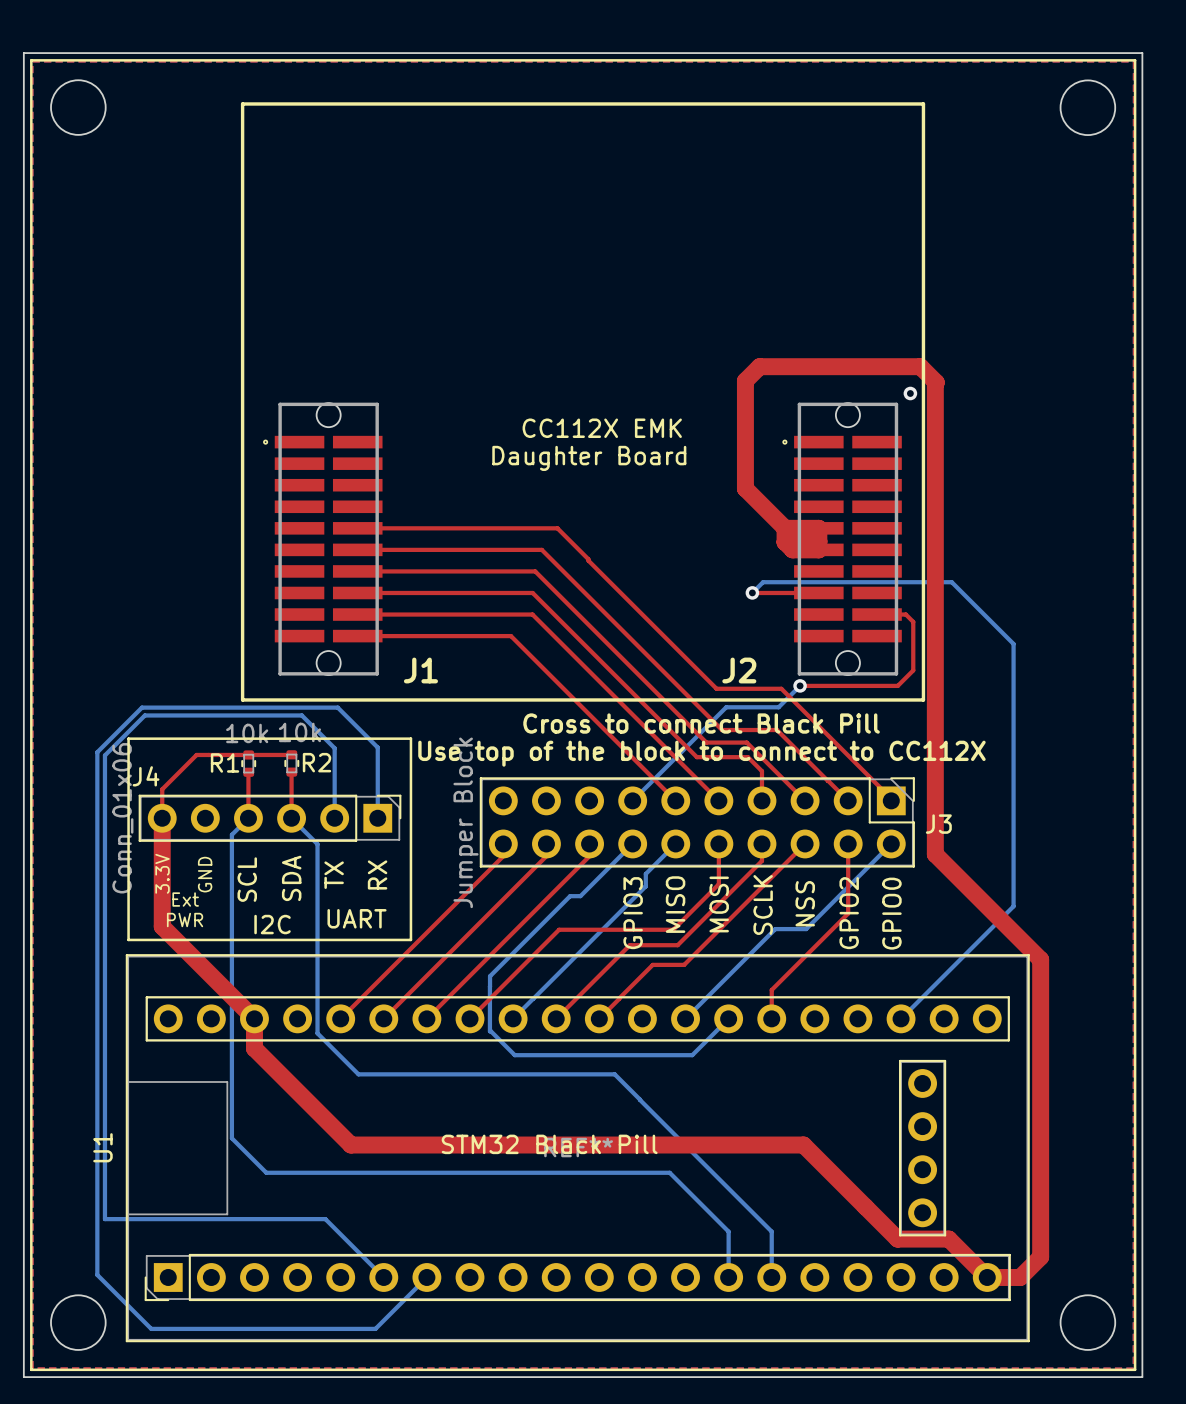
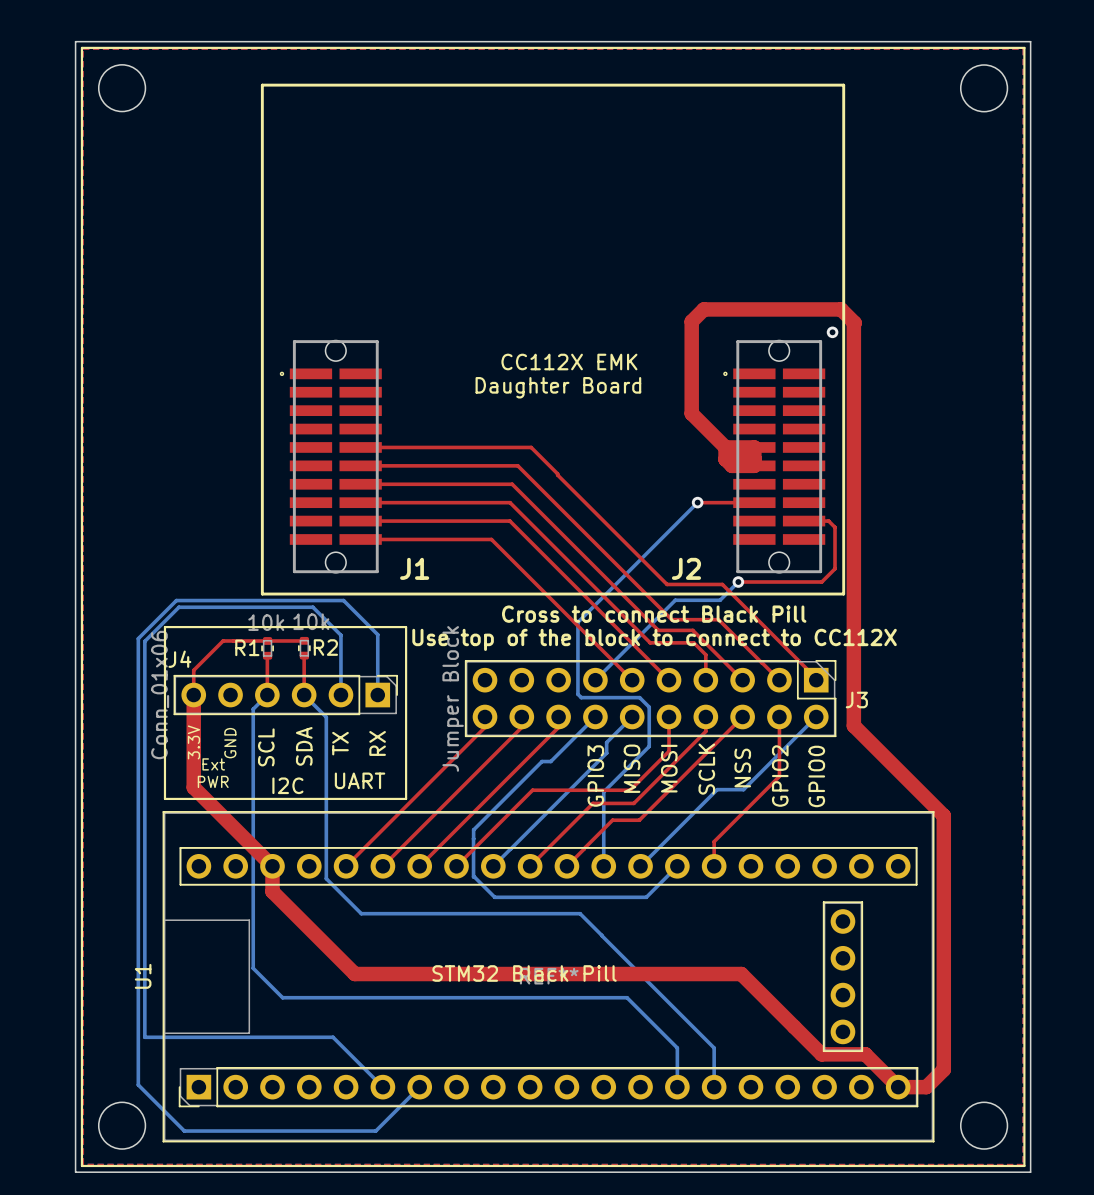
bottom track: (752, 592) (763, 582) (951, 582) (1013, 643) (1013, 906) (901, 1018) -> (697, 502) (577, 622) (577, 694) (581, 697) (639, 697) (649, 707) (649, 746) (603, 791) (603, 866)

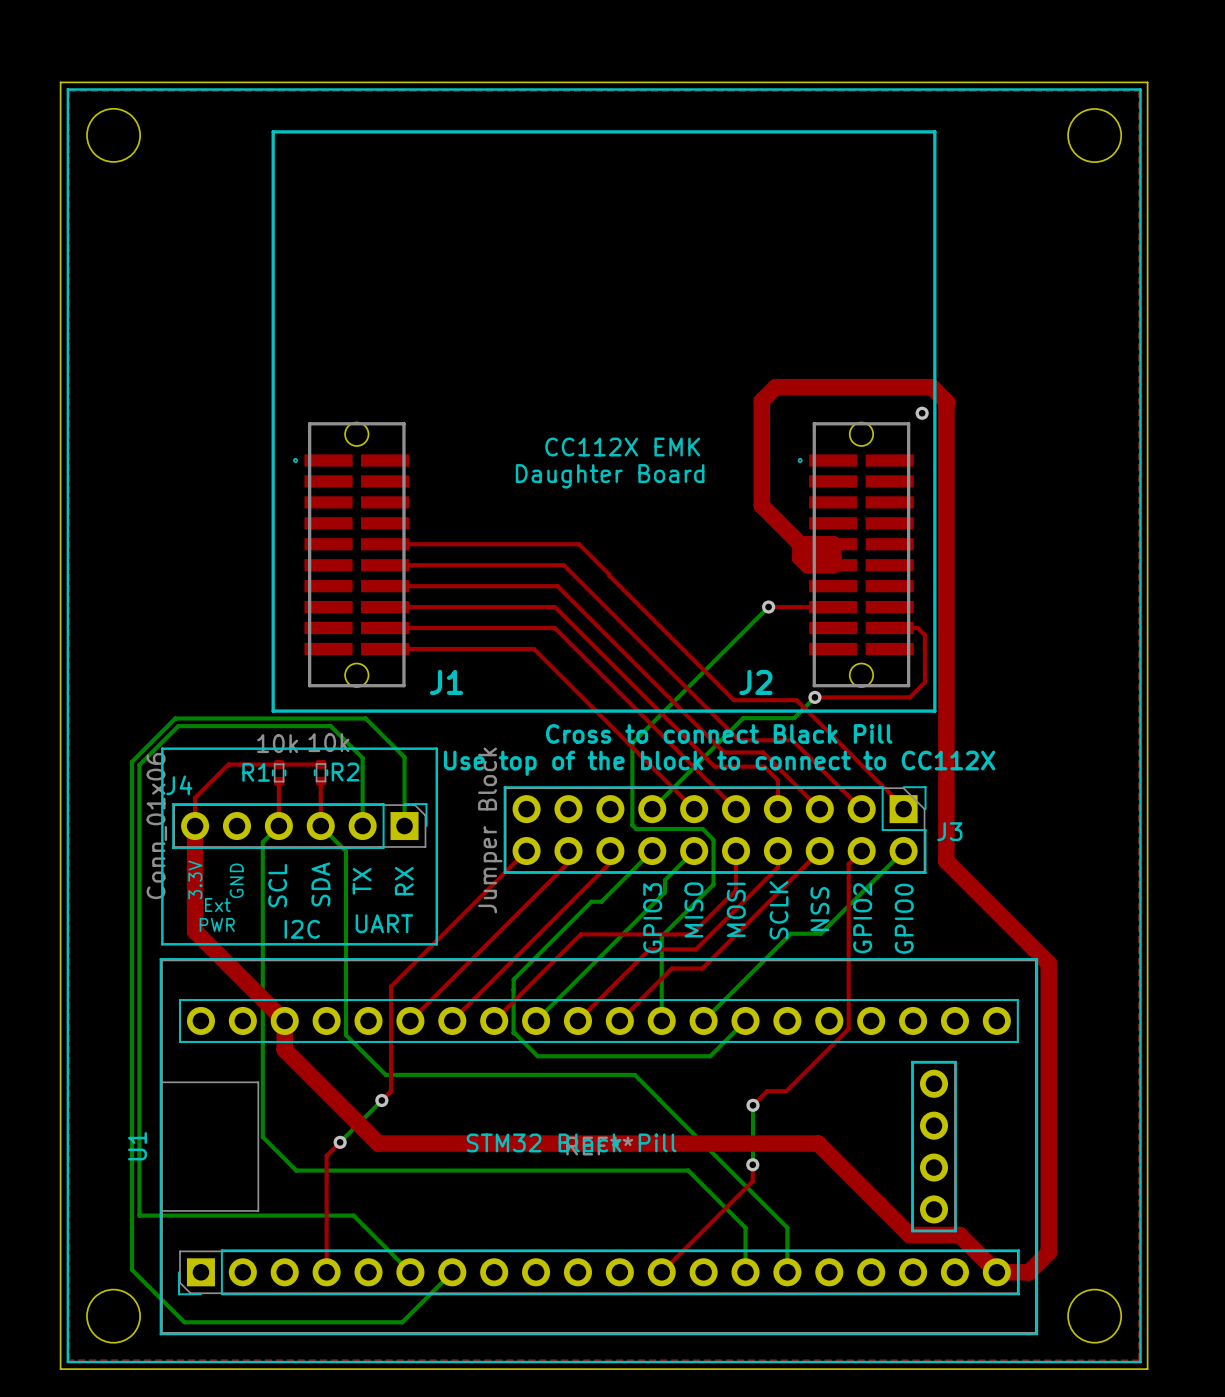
top track: none -> (526, 851) (391, 986) (391, 1091) (380, 1101)
top track: (779, 716) (779, 776) (714, 841) (714, 866) -> (861, 851) (848, 864) (848, 1028) (786, 1091) (767, 1091) (752, 1105)
top track: (485, 727) (346, 866) -> none
bottom track: none -> (381, 1100) (340, 1142)
via: none -> (381, 1100)
bottom track: none -> (753, 1105) (752, 1164)
via: none -> (753, 1105)
top track: none -> (340, 1142) (326, 1155) (326, 1272)
via: none -> (340, 1142)
top track: none -> (752, 1164) (752, 1181) (661, 1272)
via: none -> (752, 1164)

